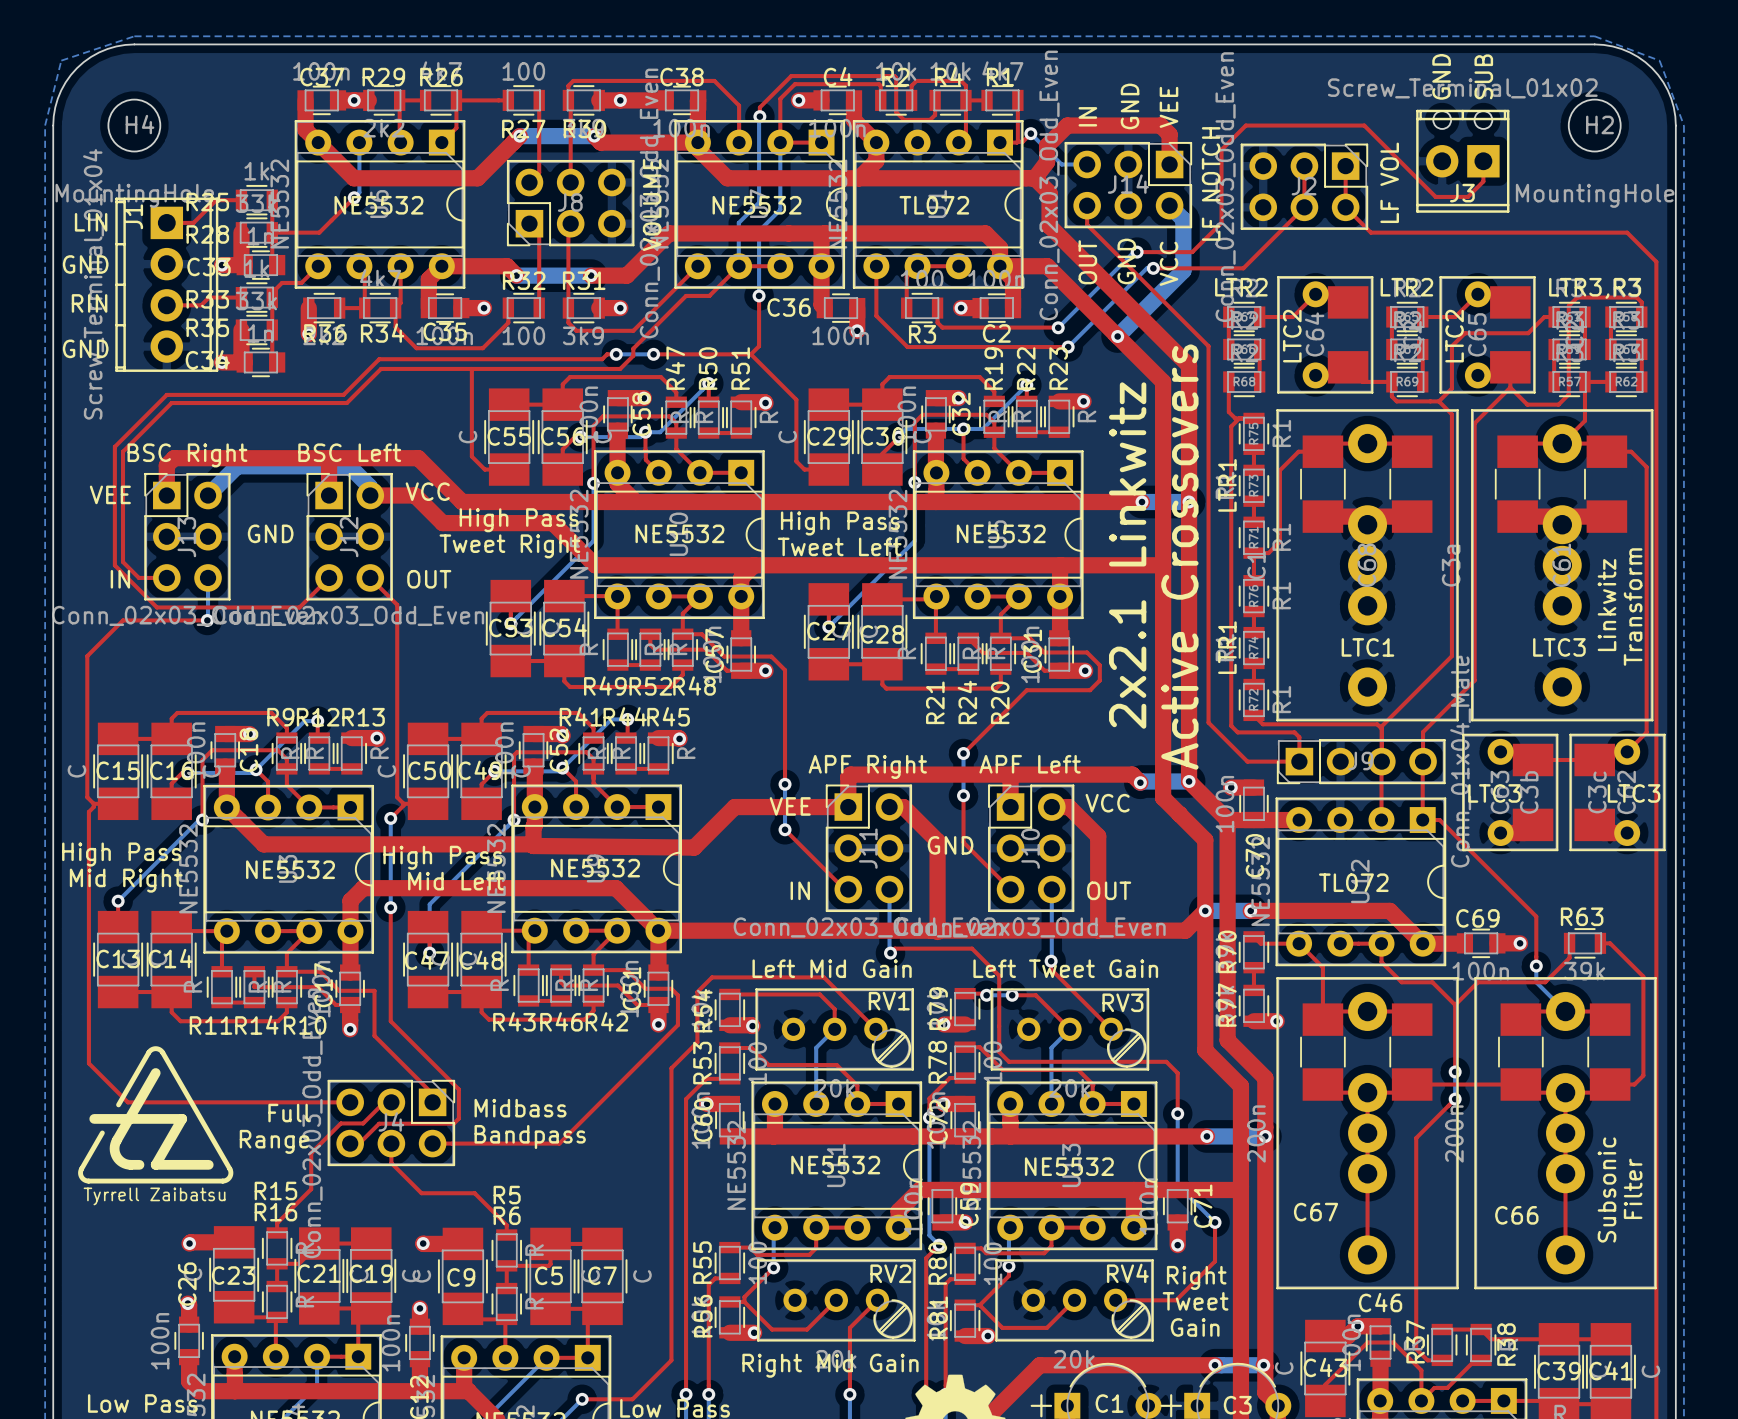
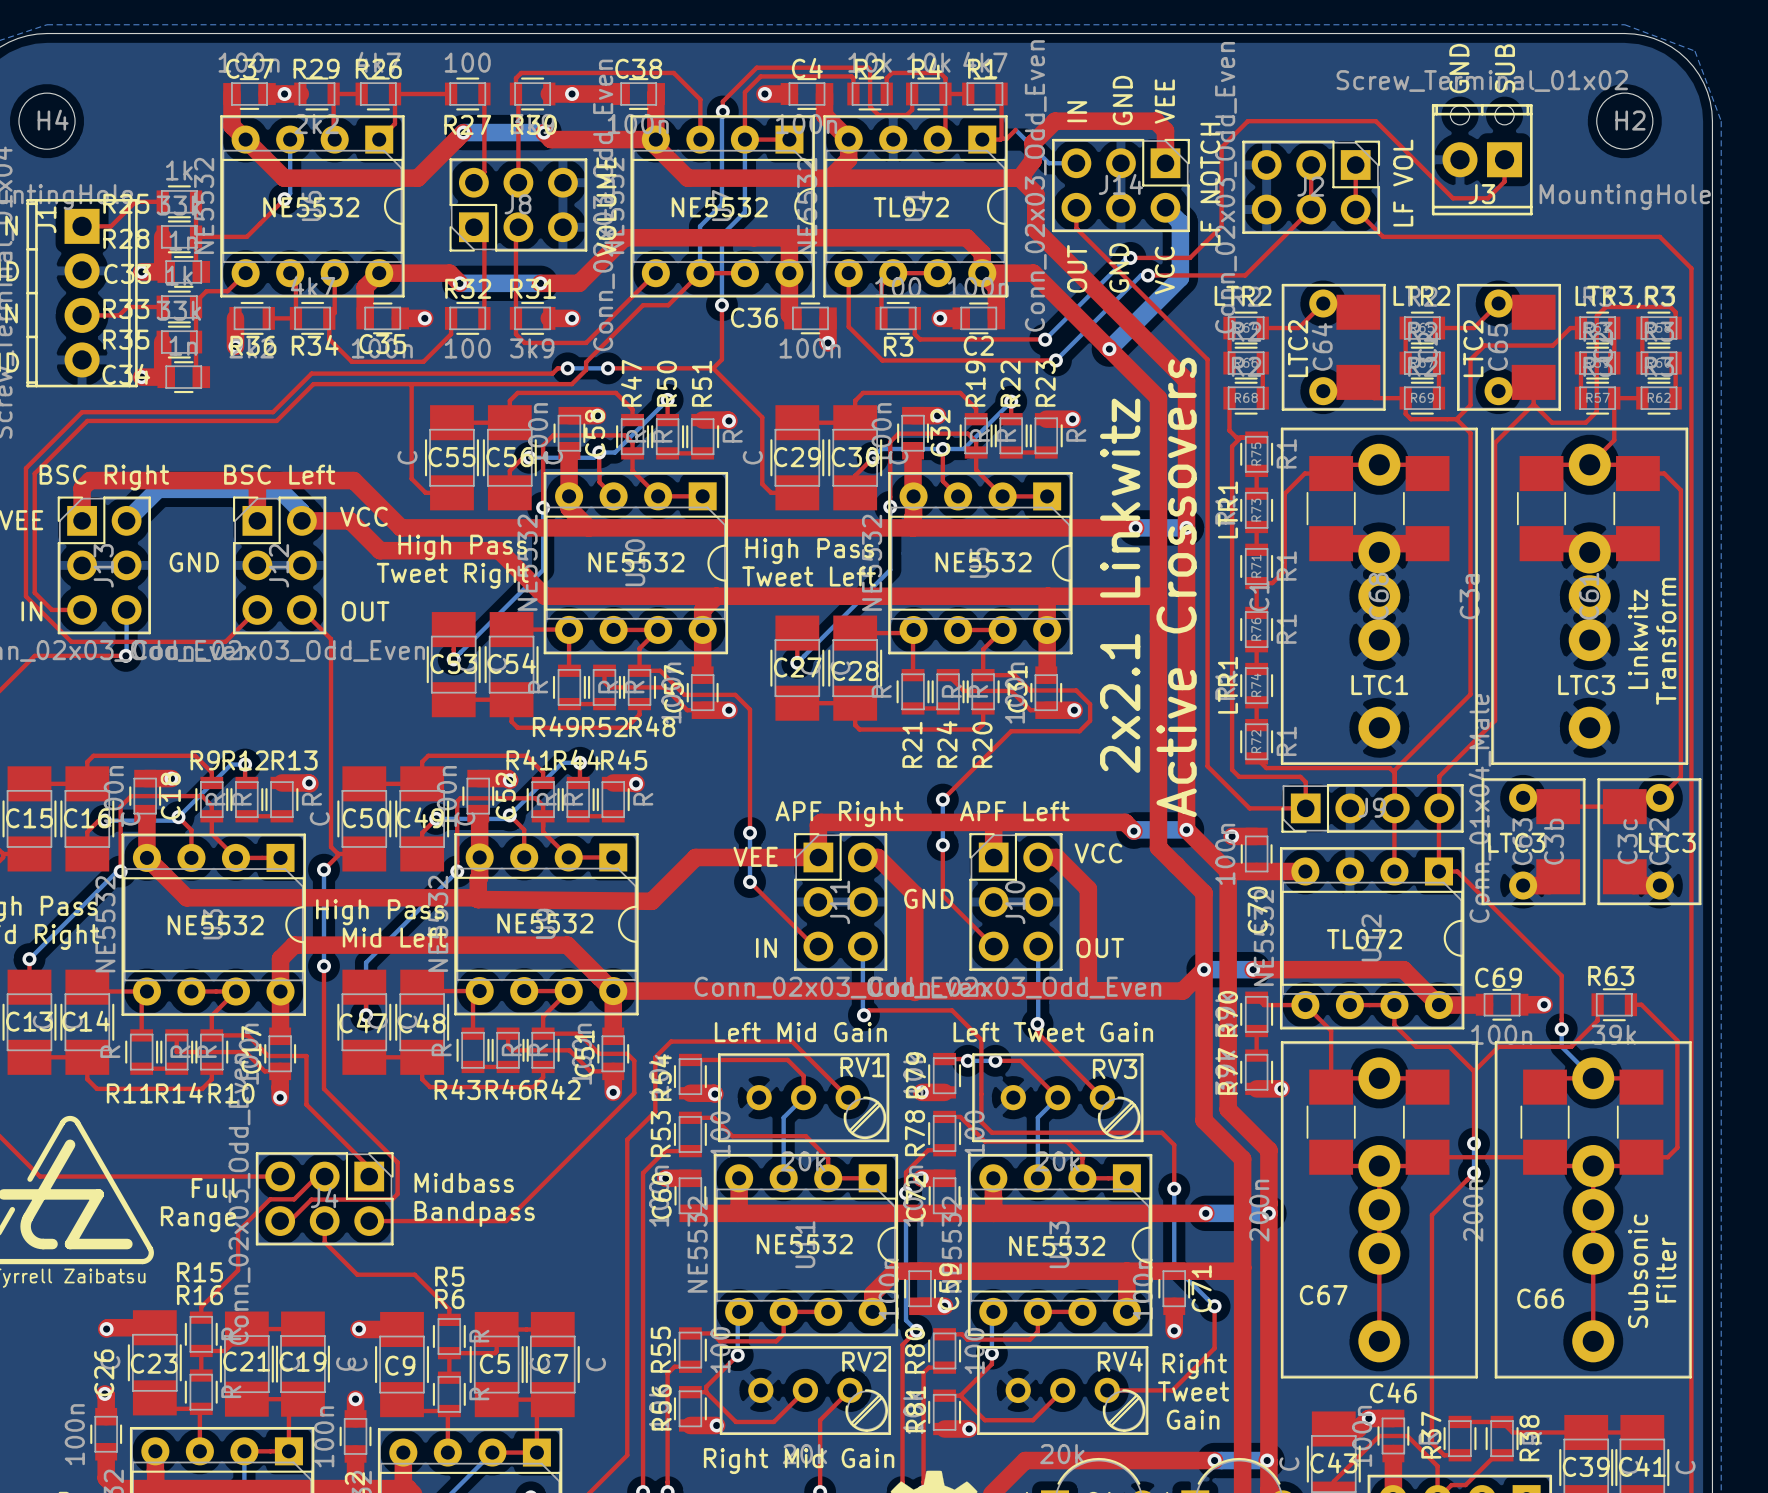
via: (1030, 133) -> none

